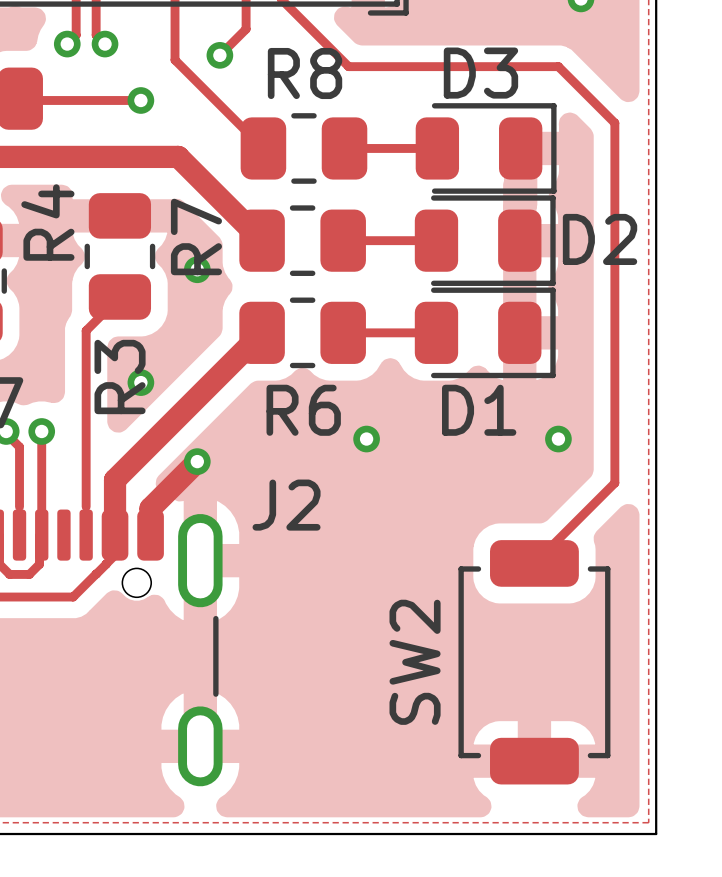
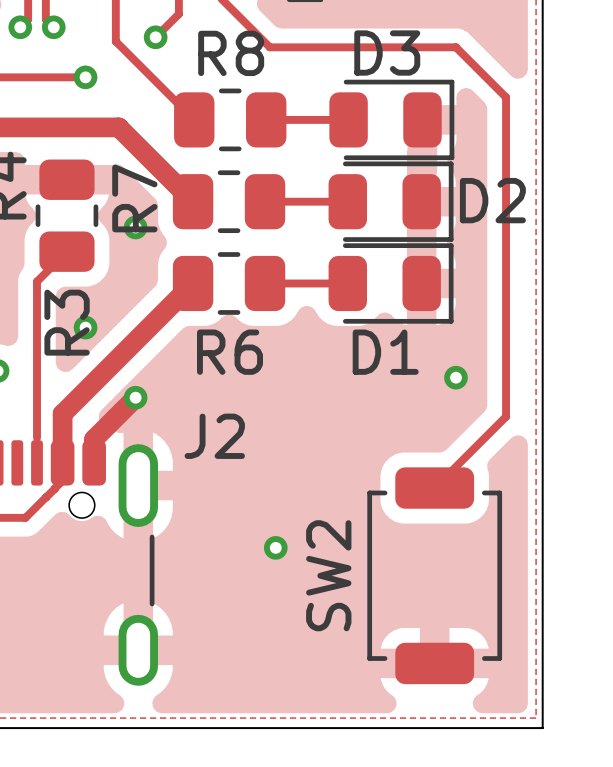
via position: (366, 439) -> (275, 547)

